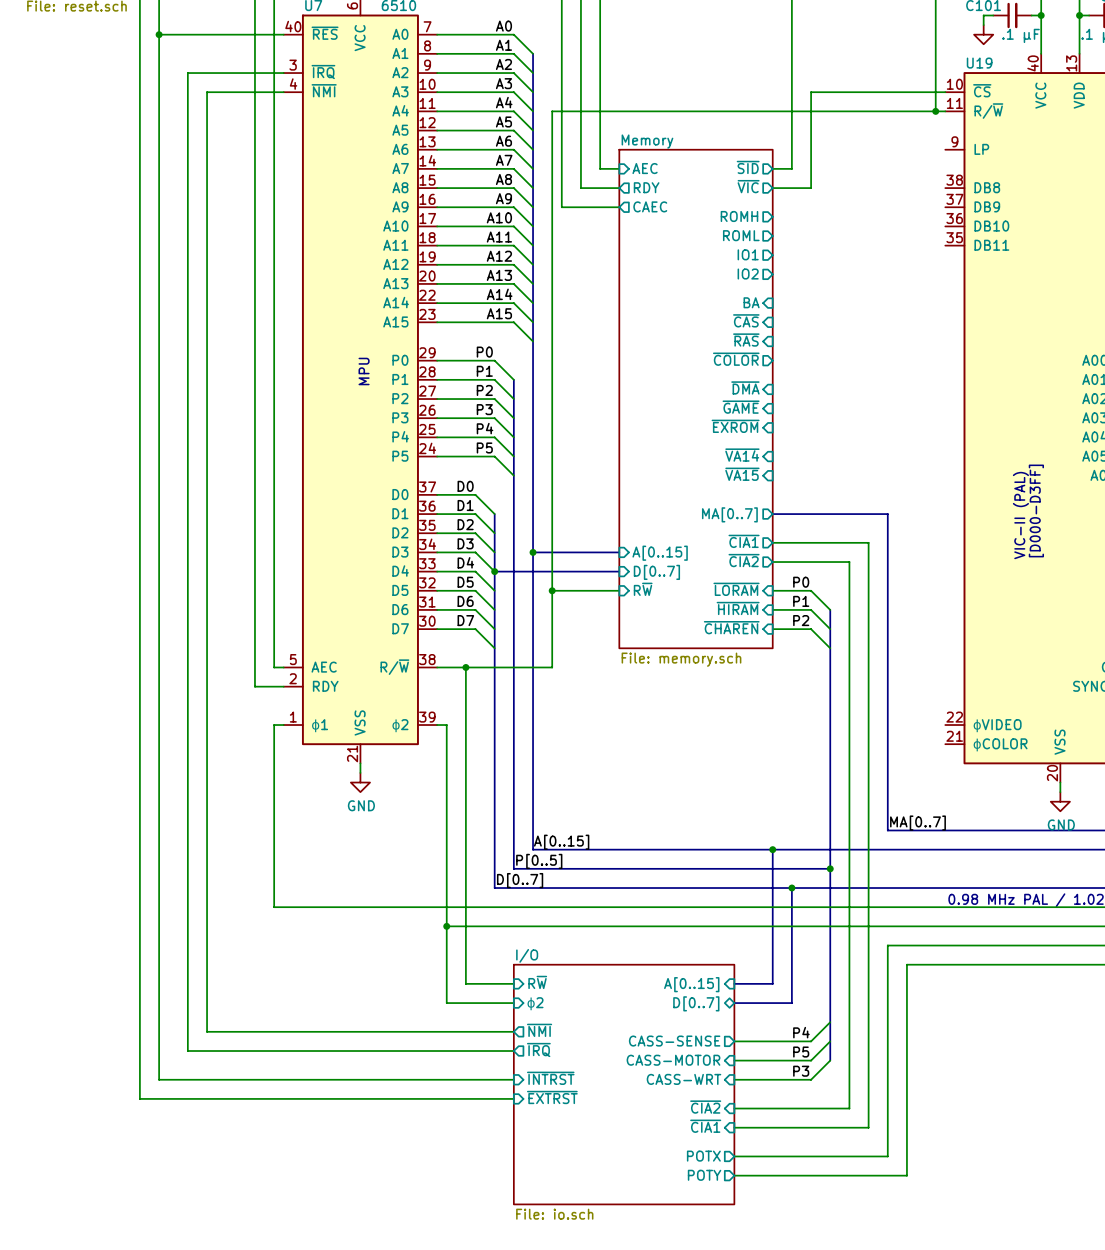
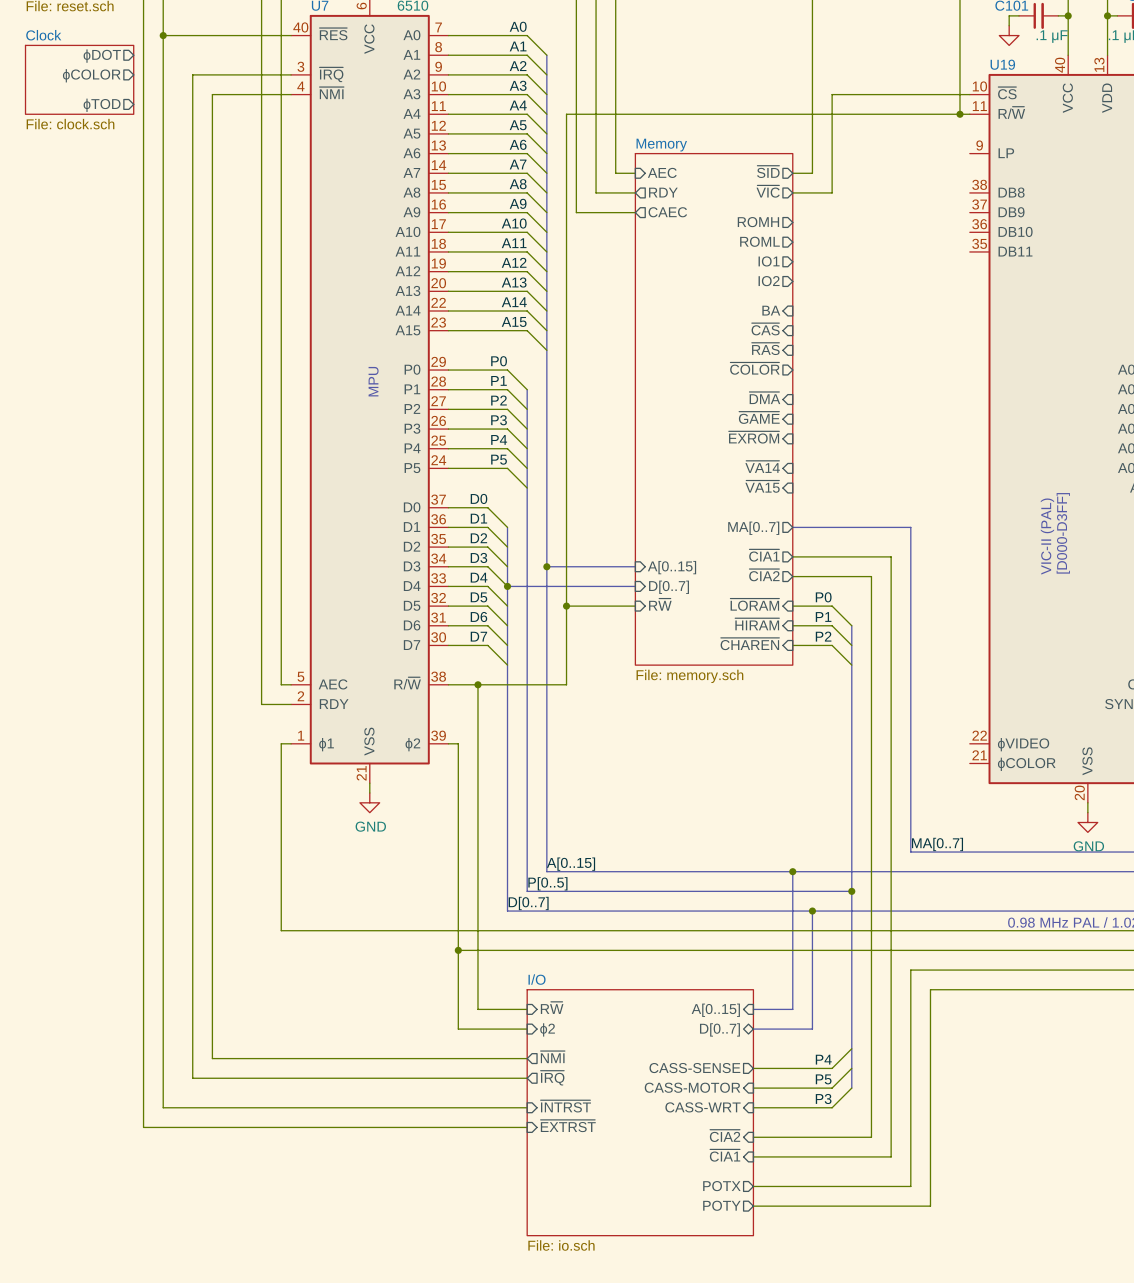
sheet pin: none -> ϕDOT (102, 56)
sheet pin: none -> ϕCOLOR (91, 75)
sheet Clock: none -> File: clock.sch (79, 79)
sheet pin: none -> ϕTOD (102, 105)

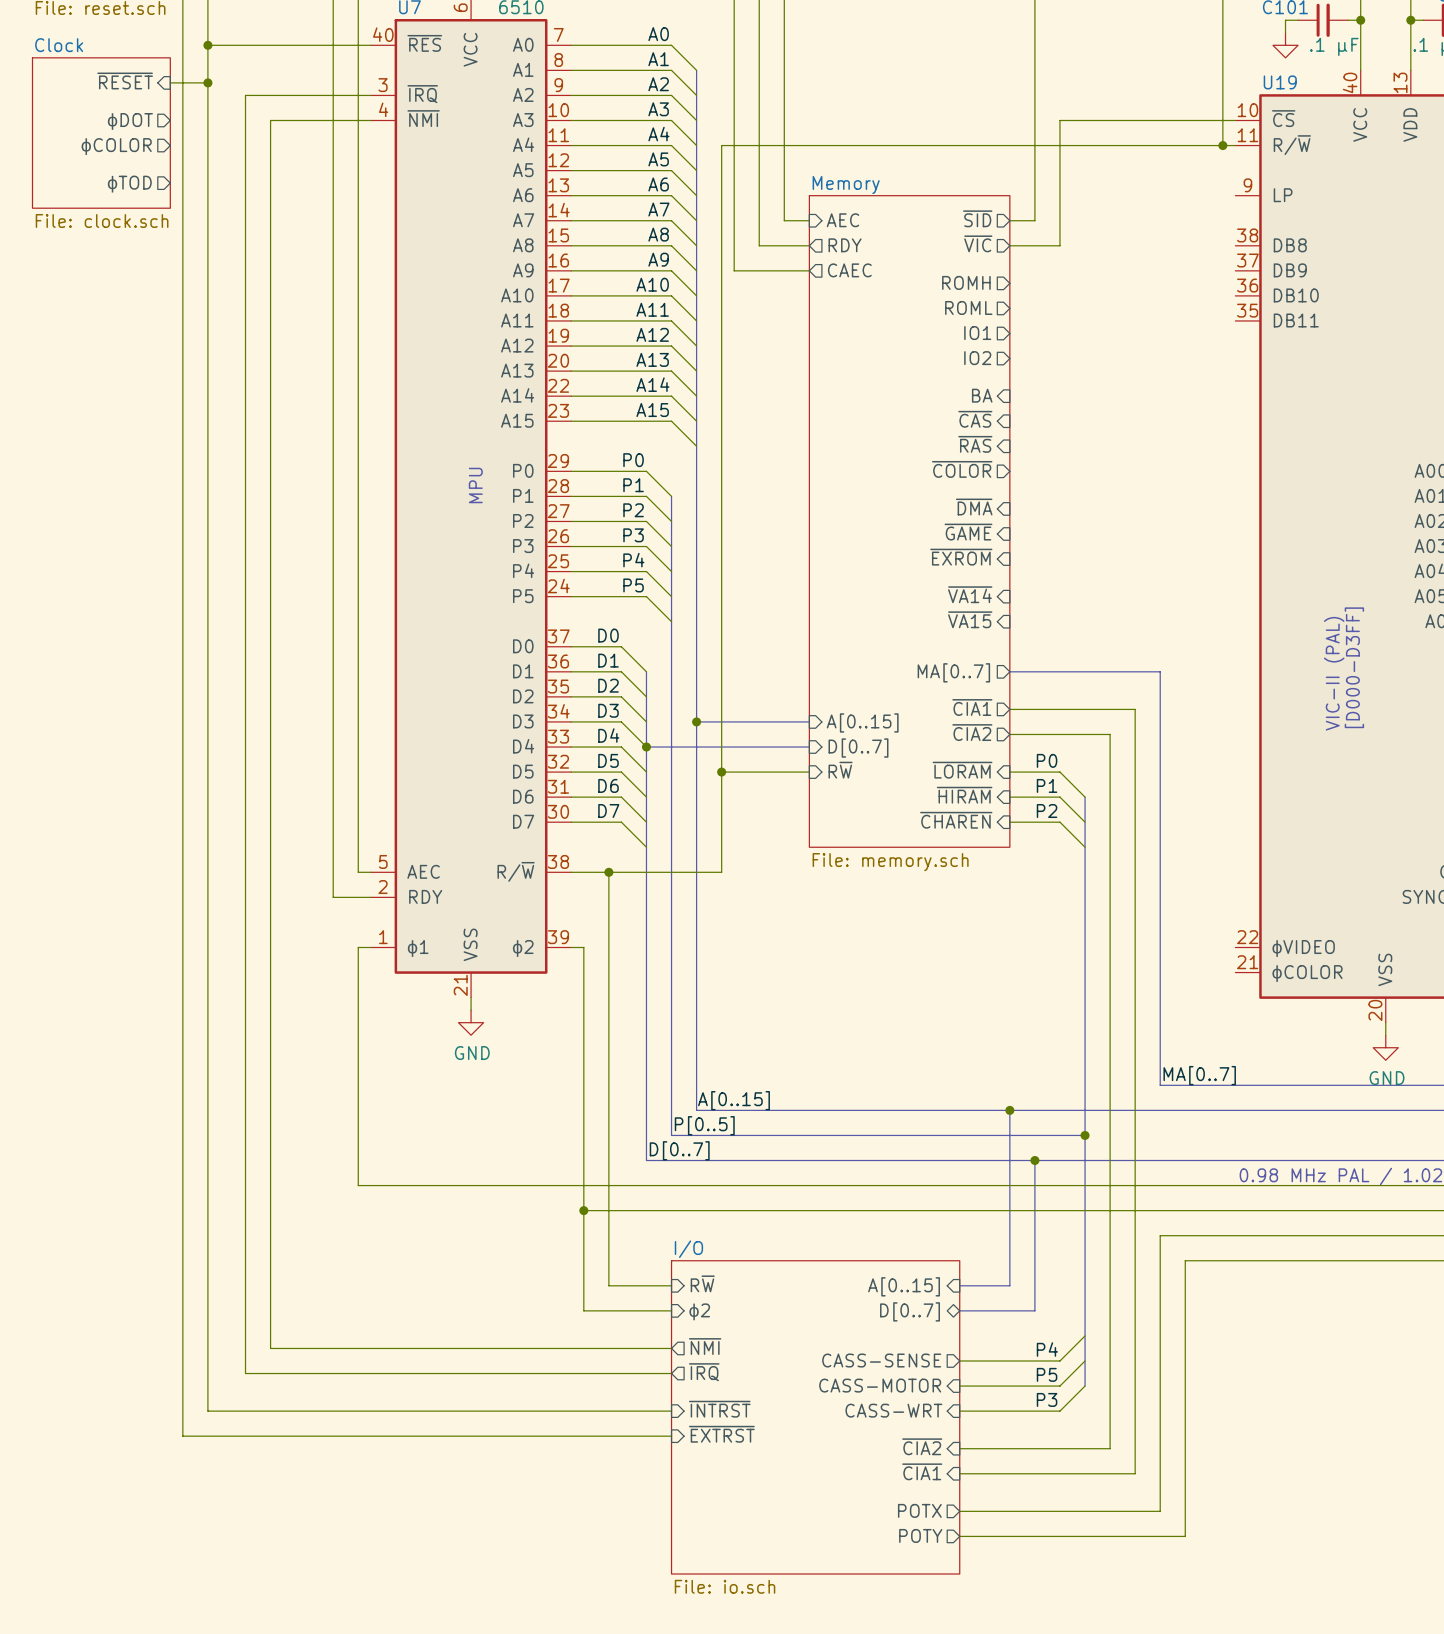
sheet pin position: ϕDOT (102, 56) -> ϕDOT (130, 121)
sheet pin: none -> ~{RESET} (125, 80)
wire: none -> (170, 82) (207, 82)
junction: none -> (207, 82)
sheet pin position: ϕCOLOR (91, 75) -> ϕCOLOR (116, 146)
sheet Clock: File: clock.sch (79, 79) -> none
sheet Clock: none -> File: clock.sch (101, 133)
sheet pin position: ϕTOD (102, 105) -> ϕTOD (129, 184)

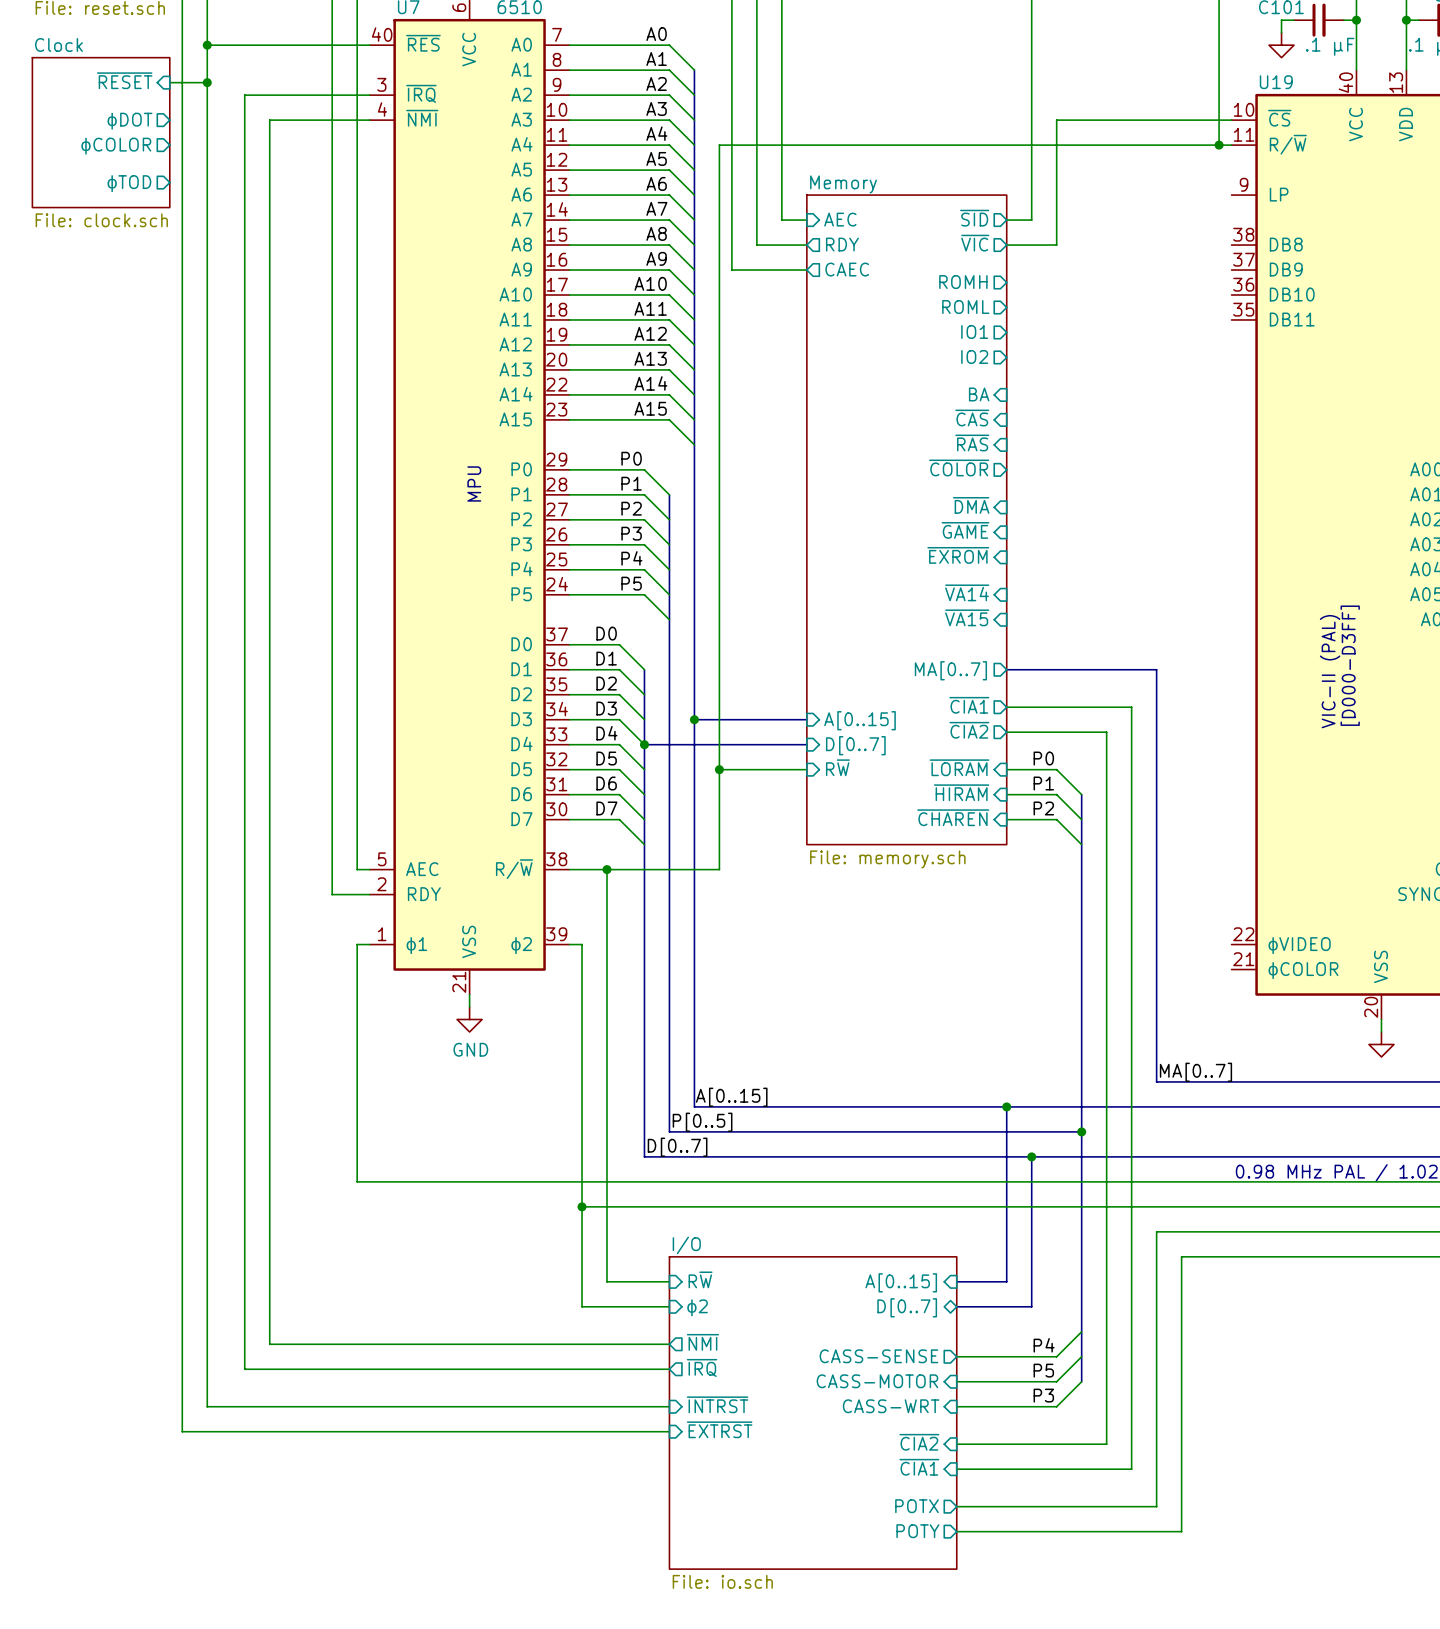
power symbol text: GND (1387, 1078) -> none

